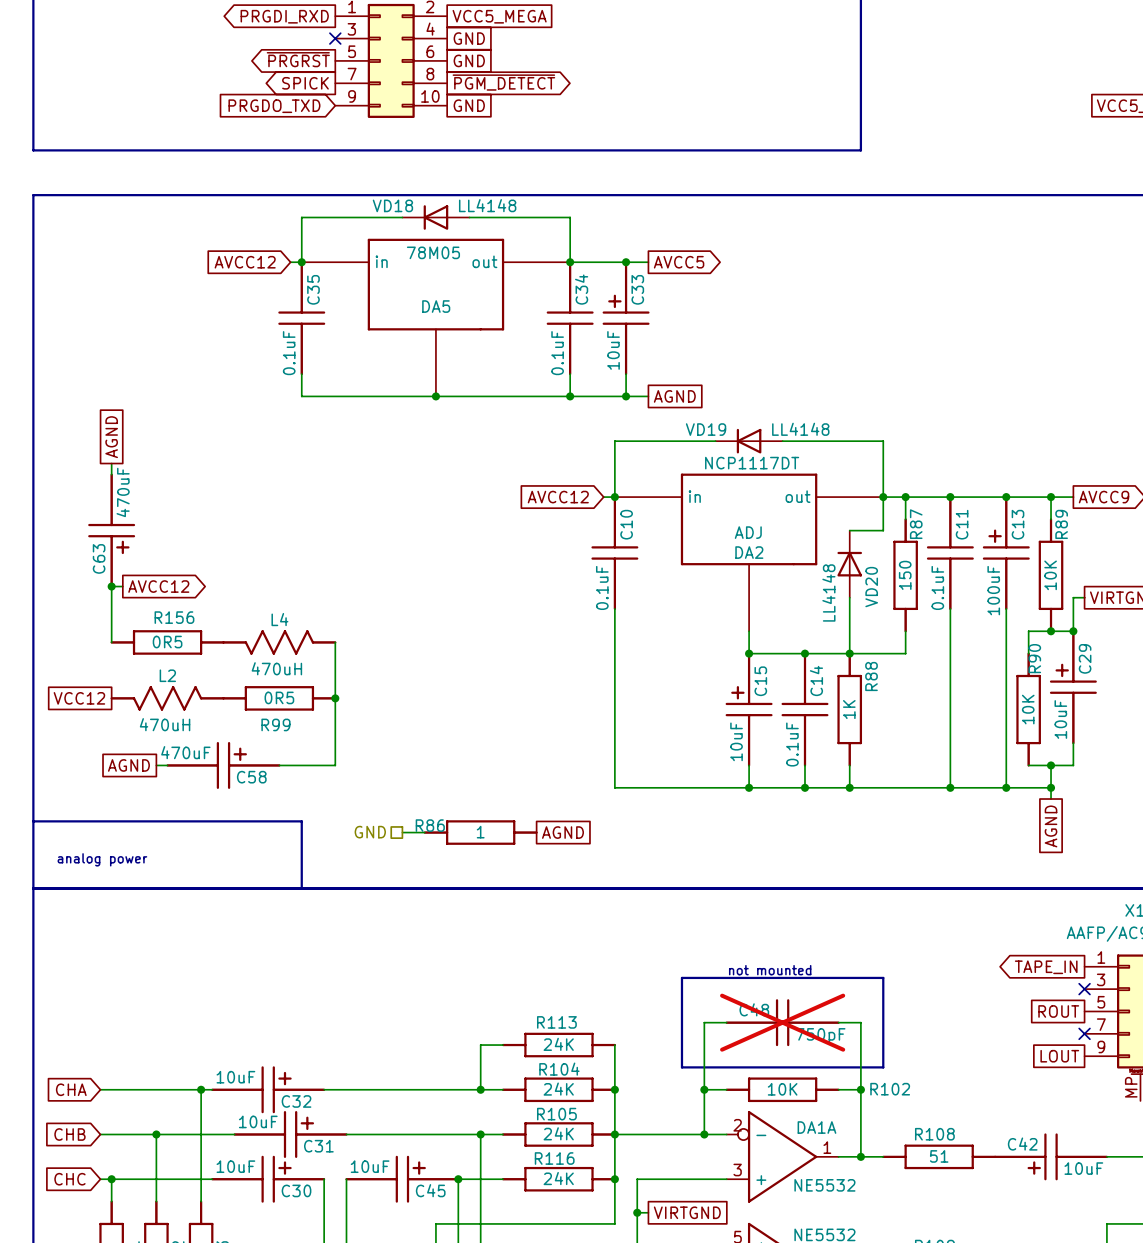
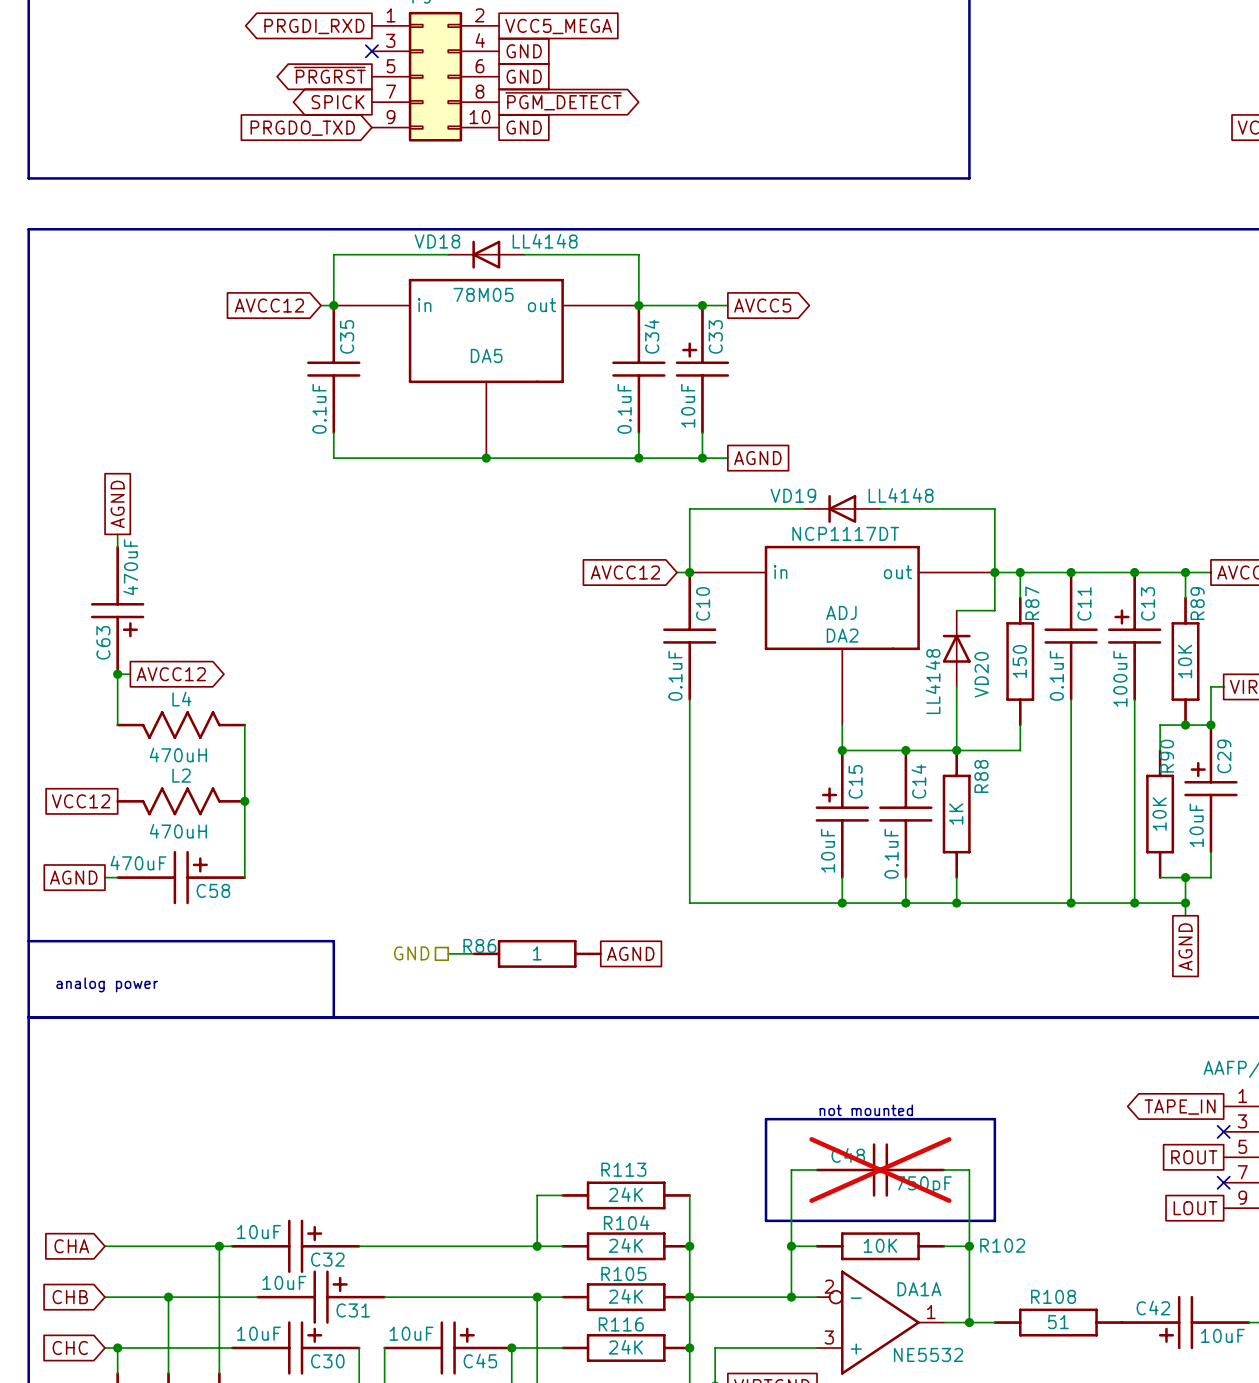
wire: (111, 631) (111, 642) -> none
wire: none -> (244, 725) (244, 877)
R156: 0R5 (167, 642) -> none
L4 position: (279, 642) -> (181, 725)
wire: (335, 642) (335, 765) (279, 765) -> none
junction: none -> (244, 801)
R99: 0R5 (279, 698) -> none
junction: (335, 698) -> none
global label position: AGND (128, 765) -> AGND (73, 877)
C58 position: (223, 765) -> (181, 877)

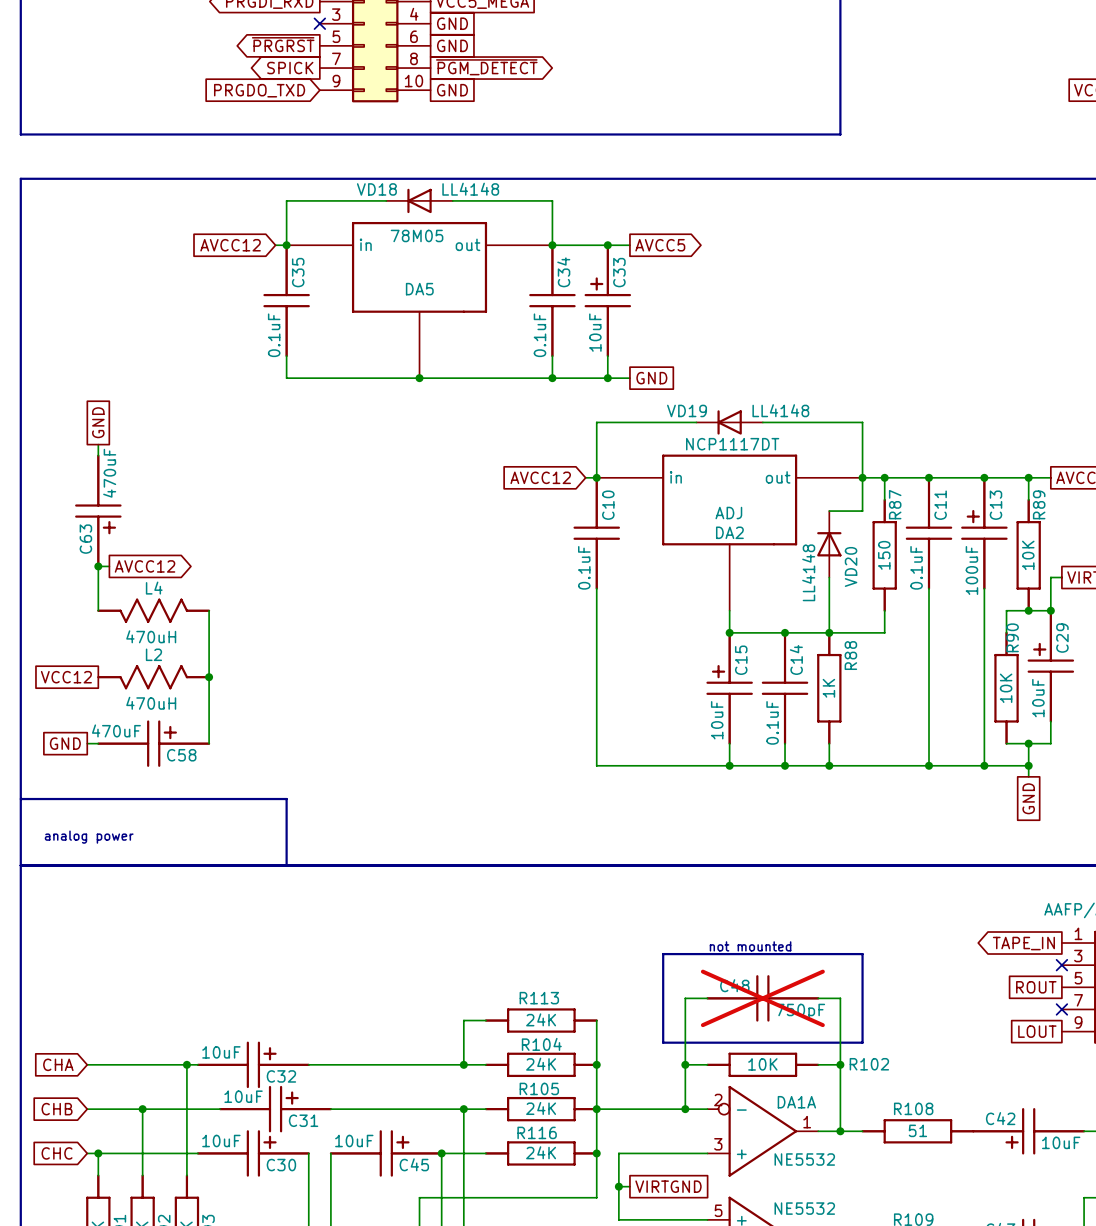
global label: AGND (757, 458) -> GND (651, 378)
global label: AGND (117, 504) -> GND (98, 422)
global label: AGND (73, 877) -> GND (65, 743)
global label: AGND (1185, 946) -> GND (1028, 798)
hierarchical label: GND (411, 953) -> none
wire: (448, 953) (473, 953) -> none
R86: 1 (537, 953) -> none
global label: AGND (630, 953) -> none

